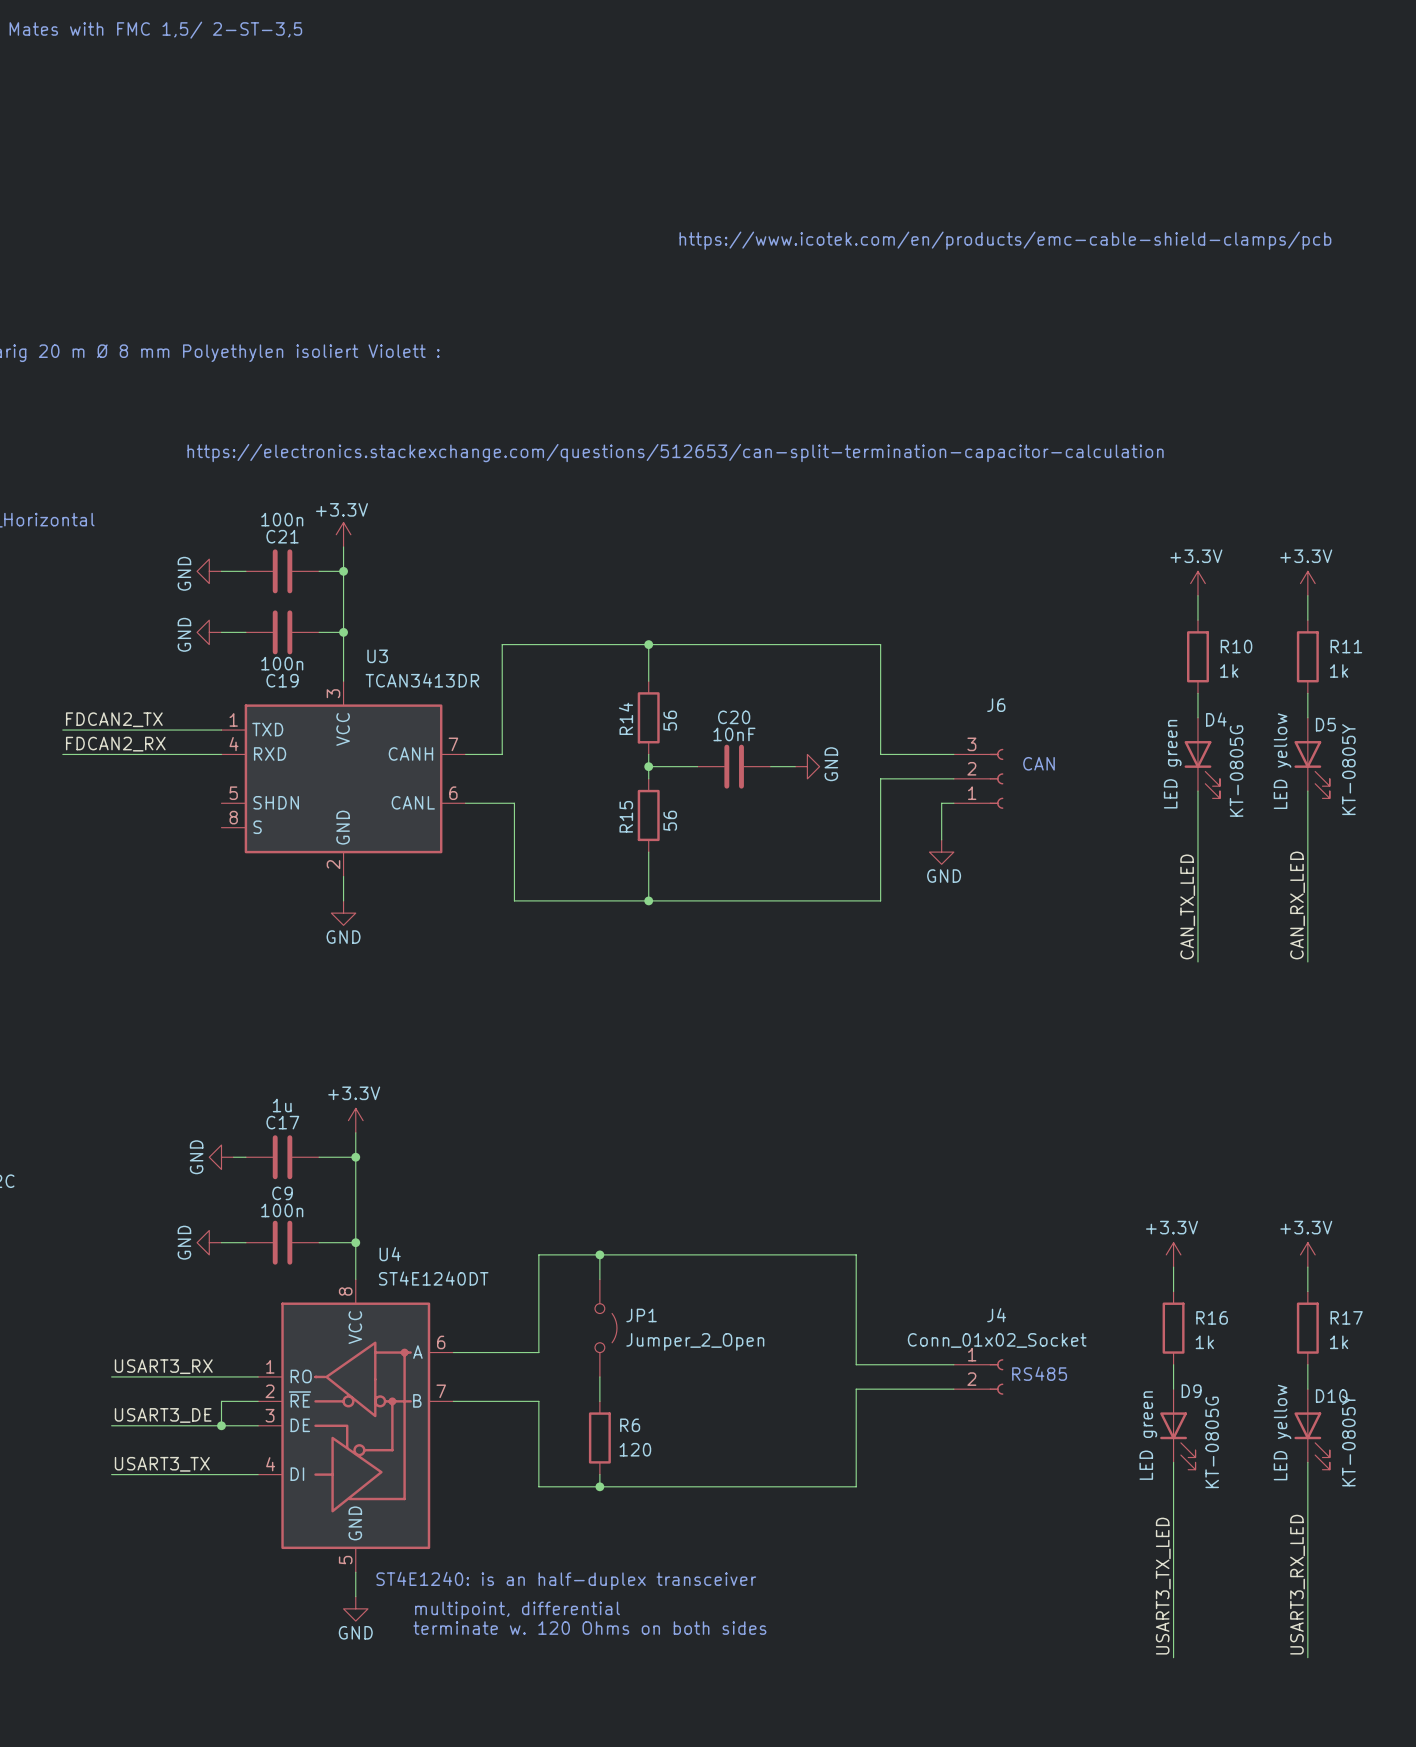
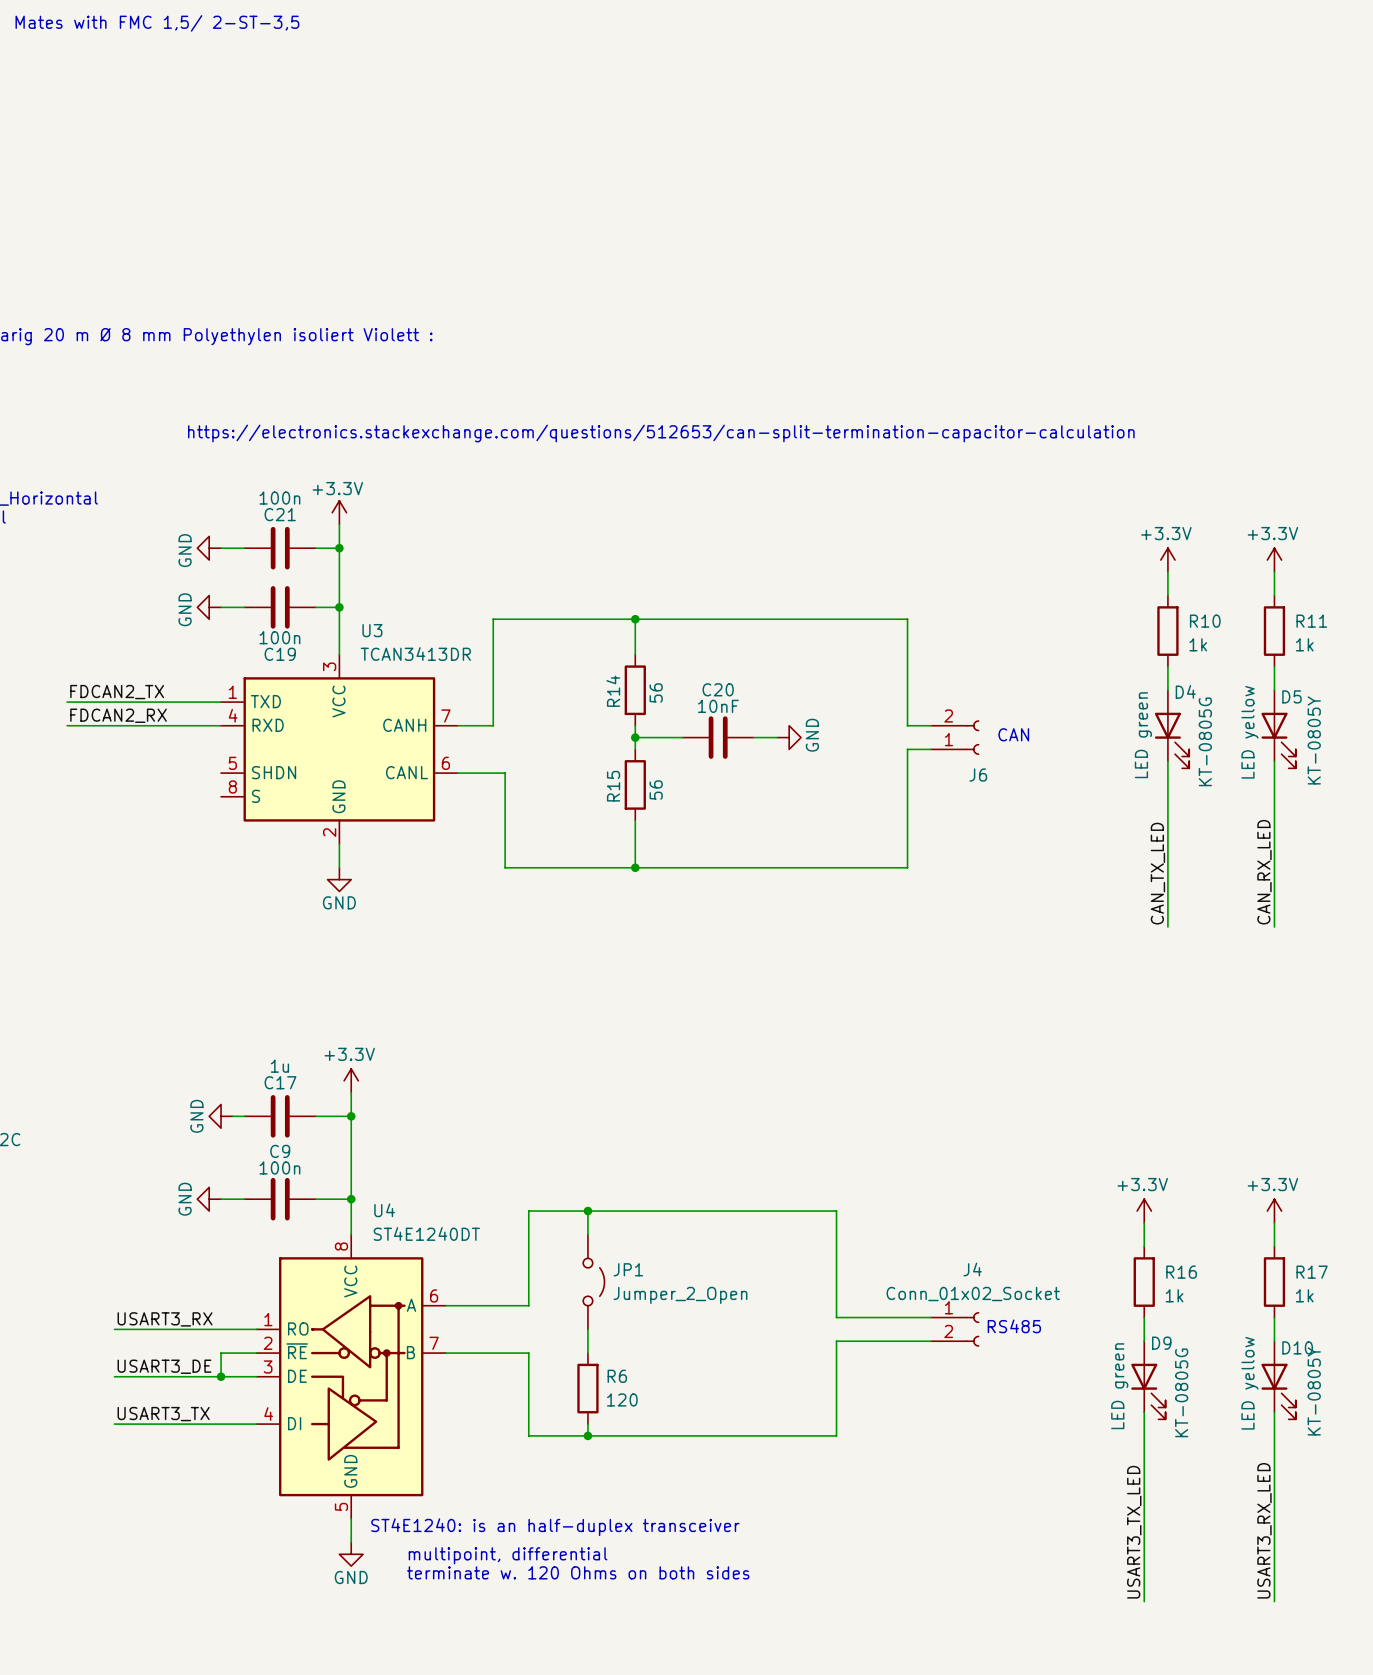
text: https://www.icotek.com/en/products/emc-cable-shield-clamps/pcb (1005, 240) -> none
wire: (880, 644) (880, 754) (929, 754) -> (860, 619) (907, 619) (907, 725)
J6 name position: J6 (996, 705) -> J6 (978, 775)
J6 symbol: [953, 748, 1004, 809] -> [931, 720, 980, 755]
wire: (929, 778) (880, 778) (880, 900) -> (907, 749) (907, 867) (860, 867)
wire: (953, 803) (941, 803) (941, 839) -> none
power symbol: GND (941, 852) -> none

